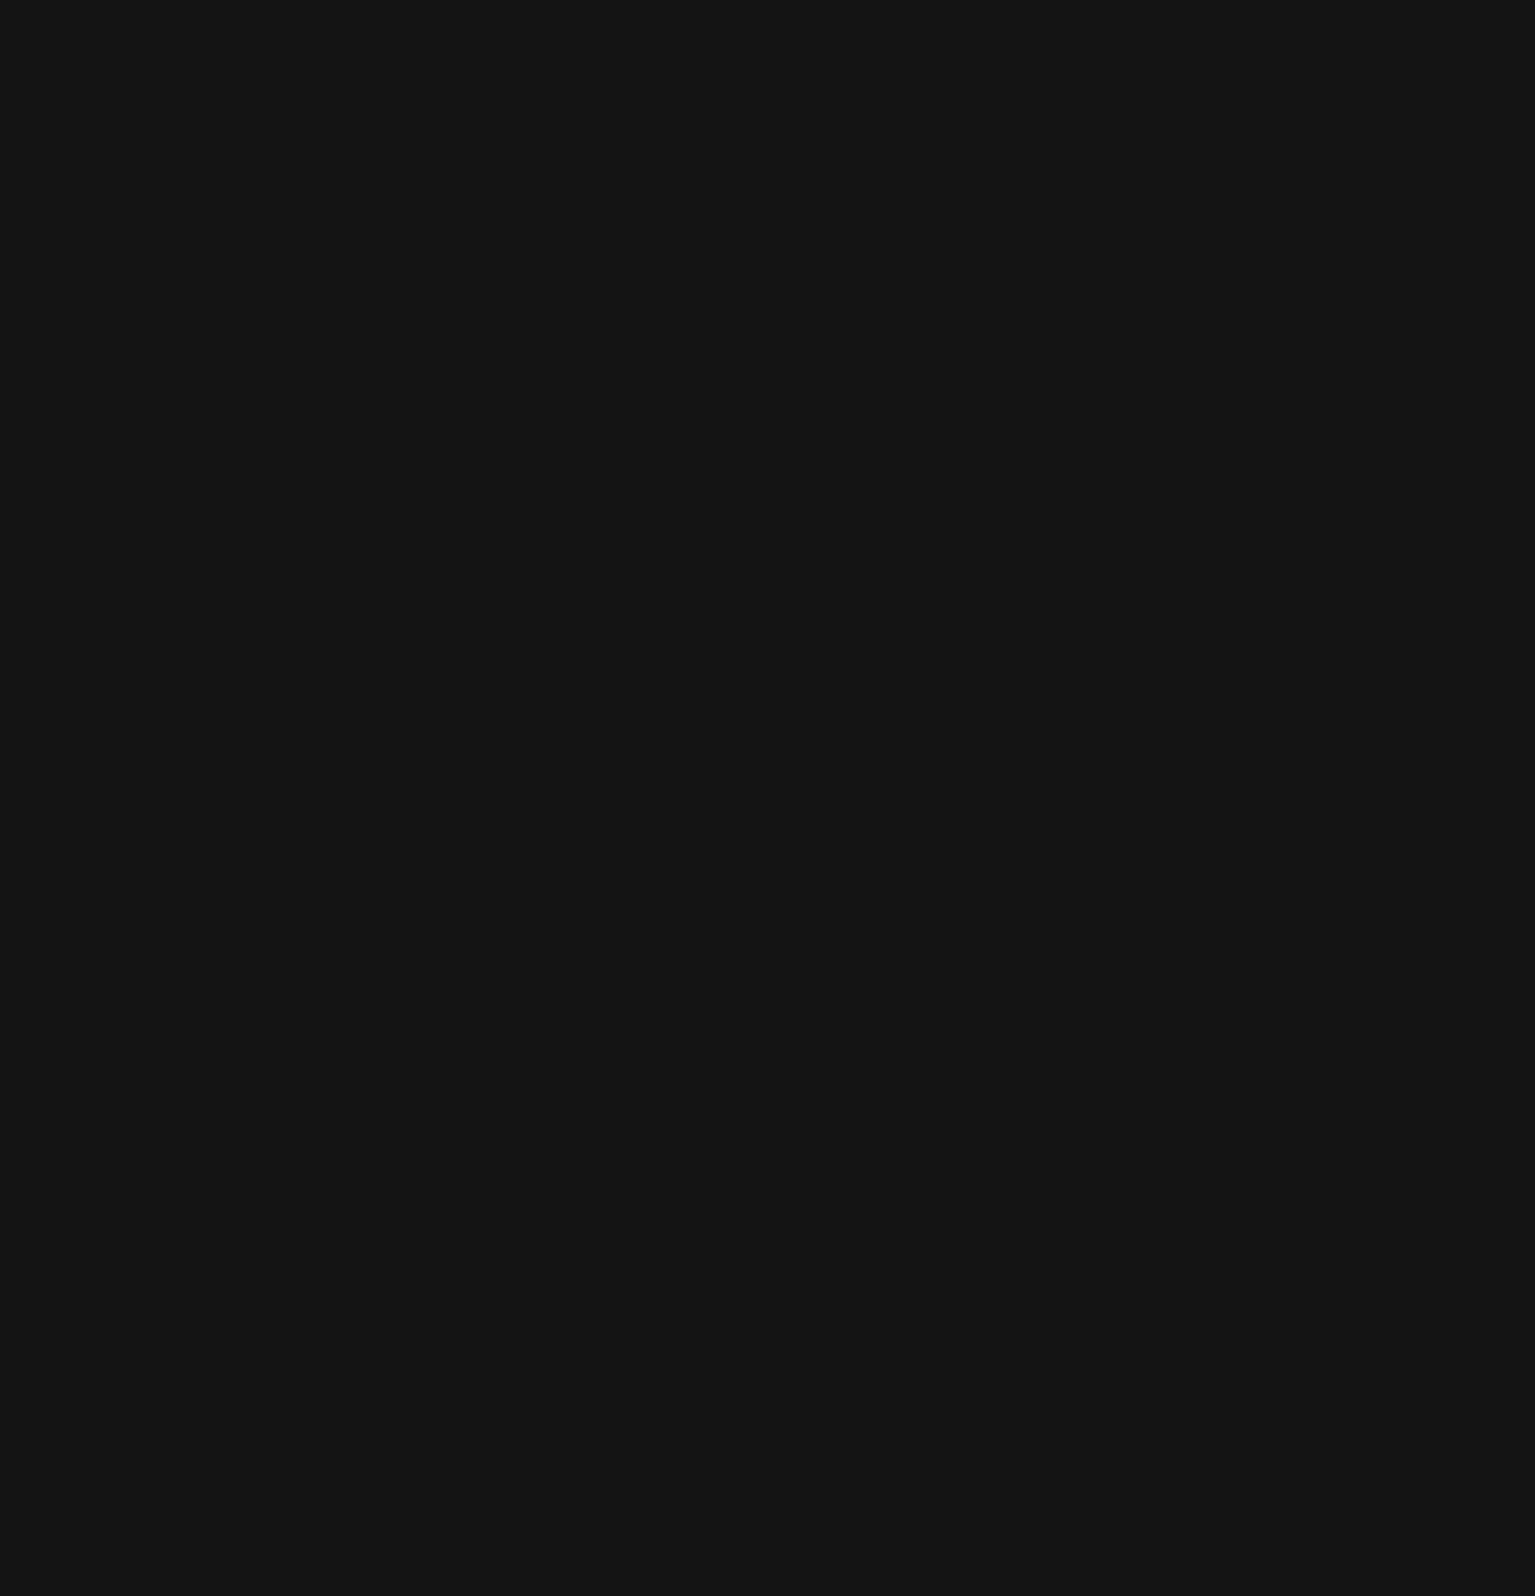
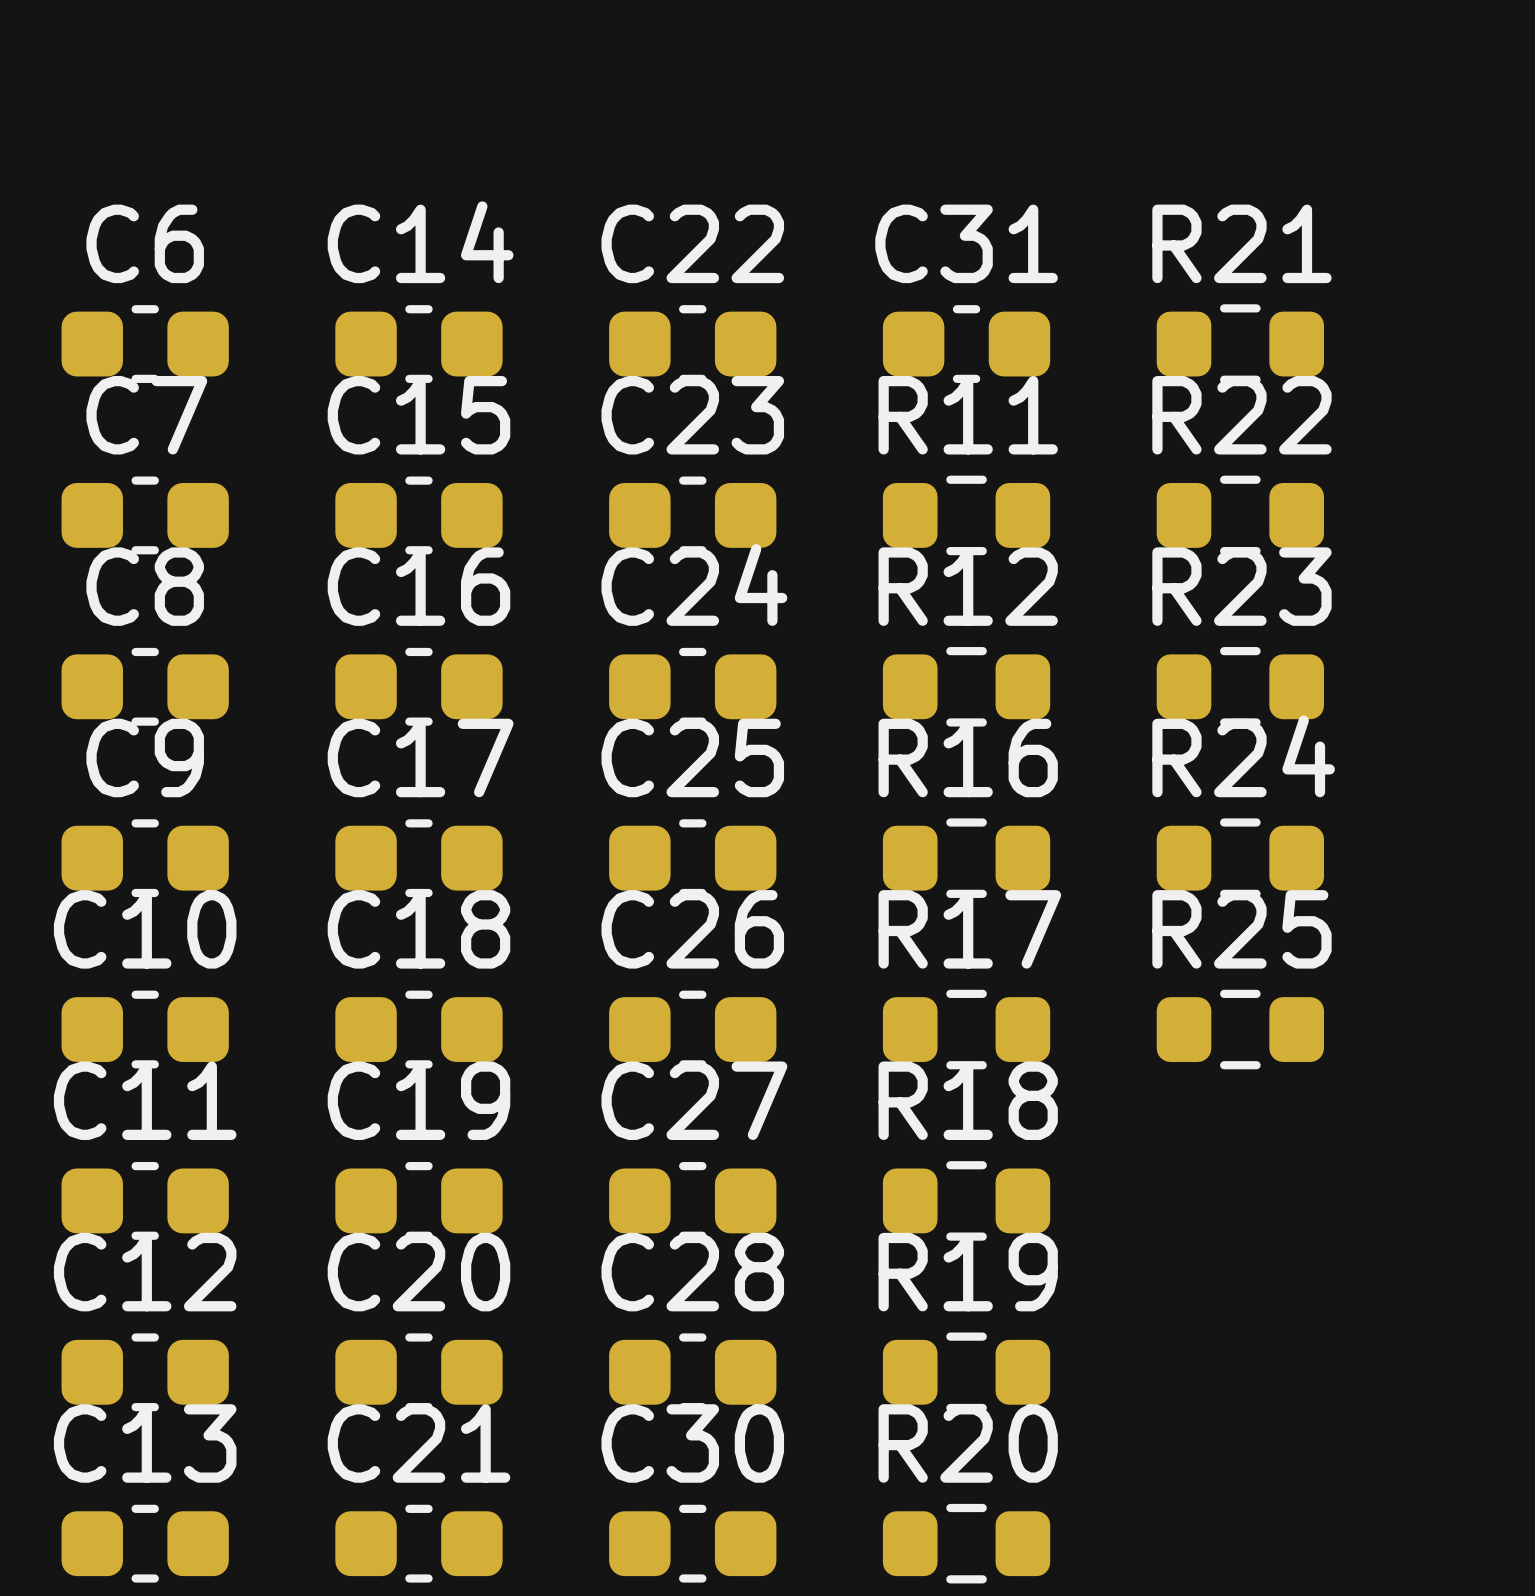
C6: none -> (145, 344)
C14: none -> (418, 344)
C22: none -> (692, 344)
C31: none -> (966, 344)
R21: none -> (1240, 344)
C7: none -> (145, 515)
C15: none -> (418, 515)
C23: none -> (692, 515)
R11: none -> (966, 515)
R22: none -> (1240, 515)
C8: none -> (145, 686)
C16: none -> (418, 686)
C24: none -> (692, 686)
R12: none -> (966, 686)
R23: none -> (1240, 686)
C9: none -> (145, 858)
C17: none -> (418, 858)
C25: none -> (692, 858)
R16: none -> (966, 858)
R24: none -> (1240, 858)
C10: none -> (145, 1029)
C18: none -> (418, 1029)
C26: none -> (692, 1029)
R17: none -> (966, 1029)
R25: none -> (1240, 1029)
C11: none -> (145, 1200)
C19: none -> (418, 1200)
C27: none -> (692, 1200)
R18: none -> (966, 1200)
C12: none -> (145, 1372)
C20: none -> (418, 1372)
C28: none -> (692, 1372)
R19: none -> (966, 1372)
C13: none -> (145, 1543)
C21: none -> (418, 1543)
C30: none -> (692, 1543)
R20: none -> (966, 1543)

